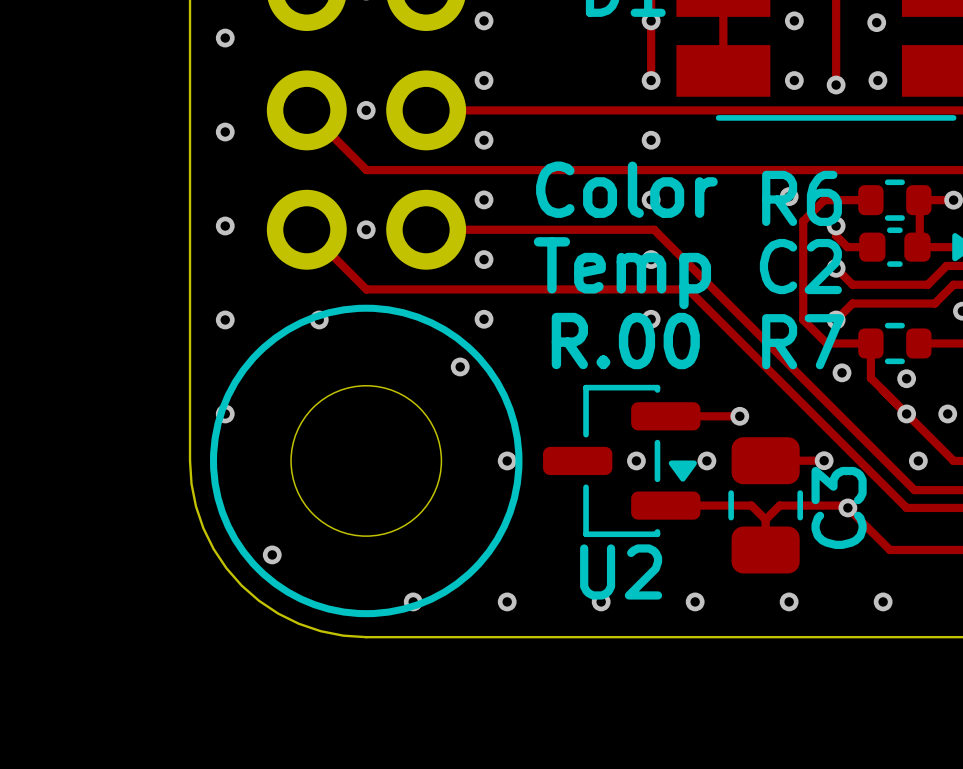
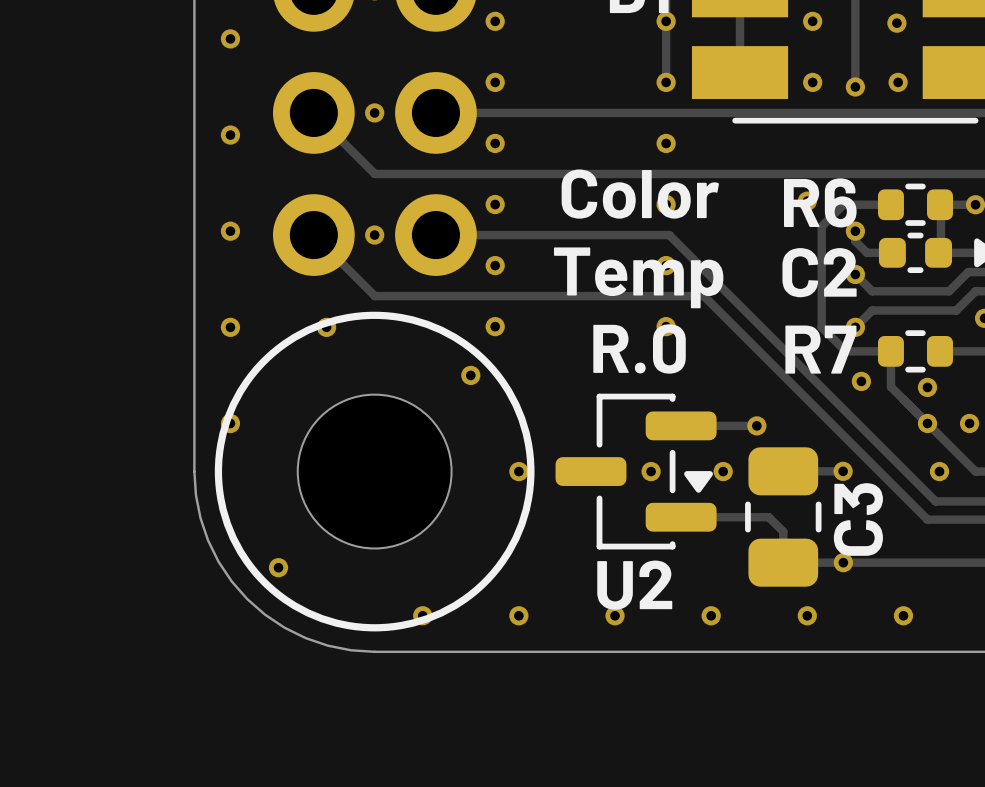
text: R.00 (625, 341) -> R.0 (639, 348)
via position: (847, 507) -> (843, 562)
track: (765, 519) (779, 505) (845, 505) (889, 549) -> (783, 562) (910, 562)

